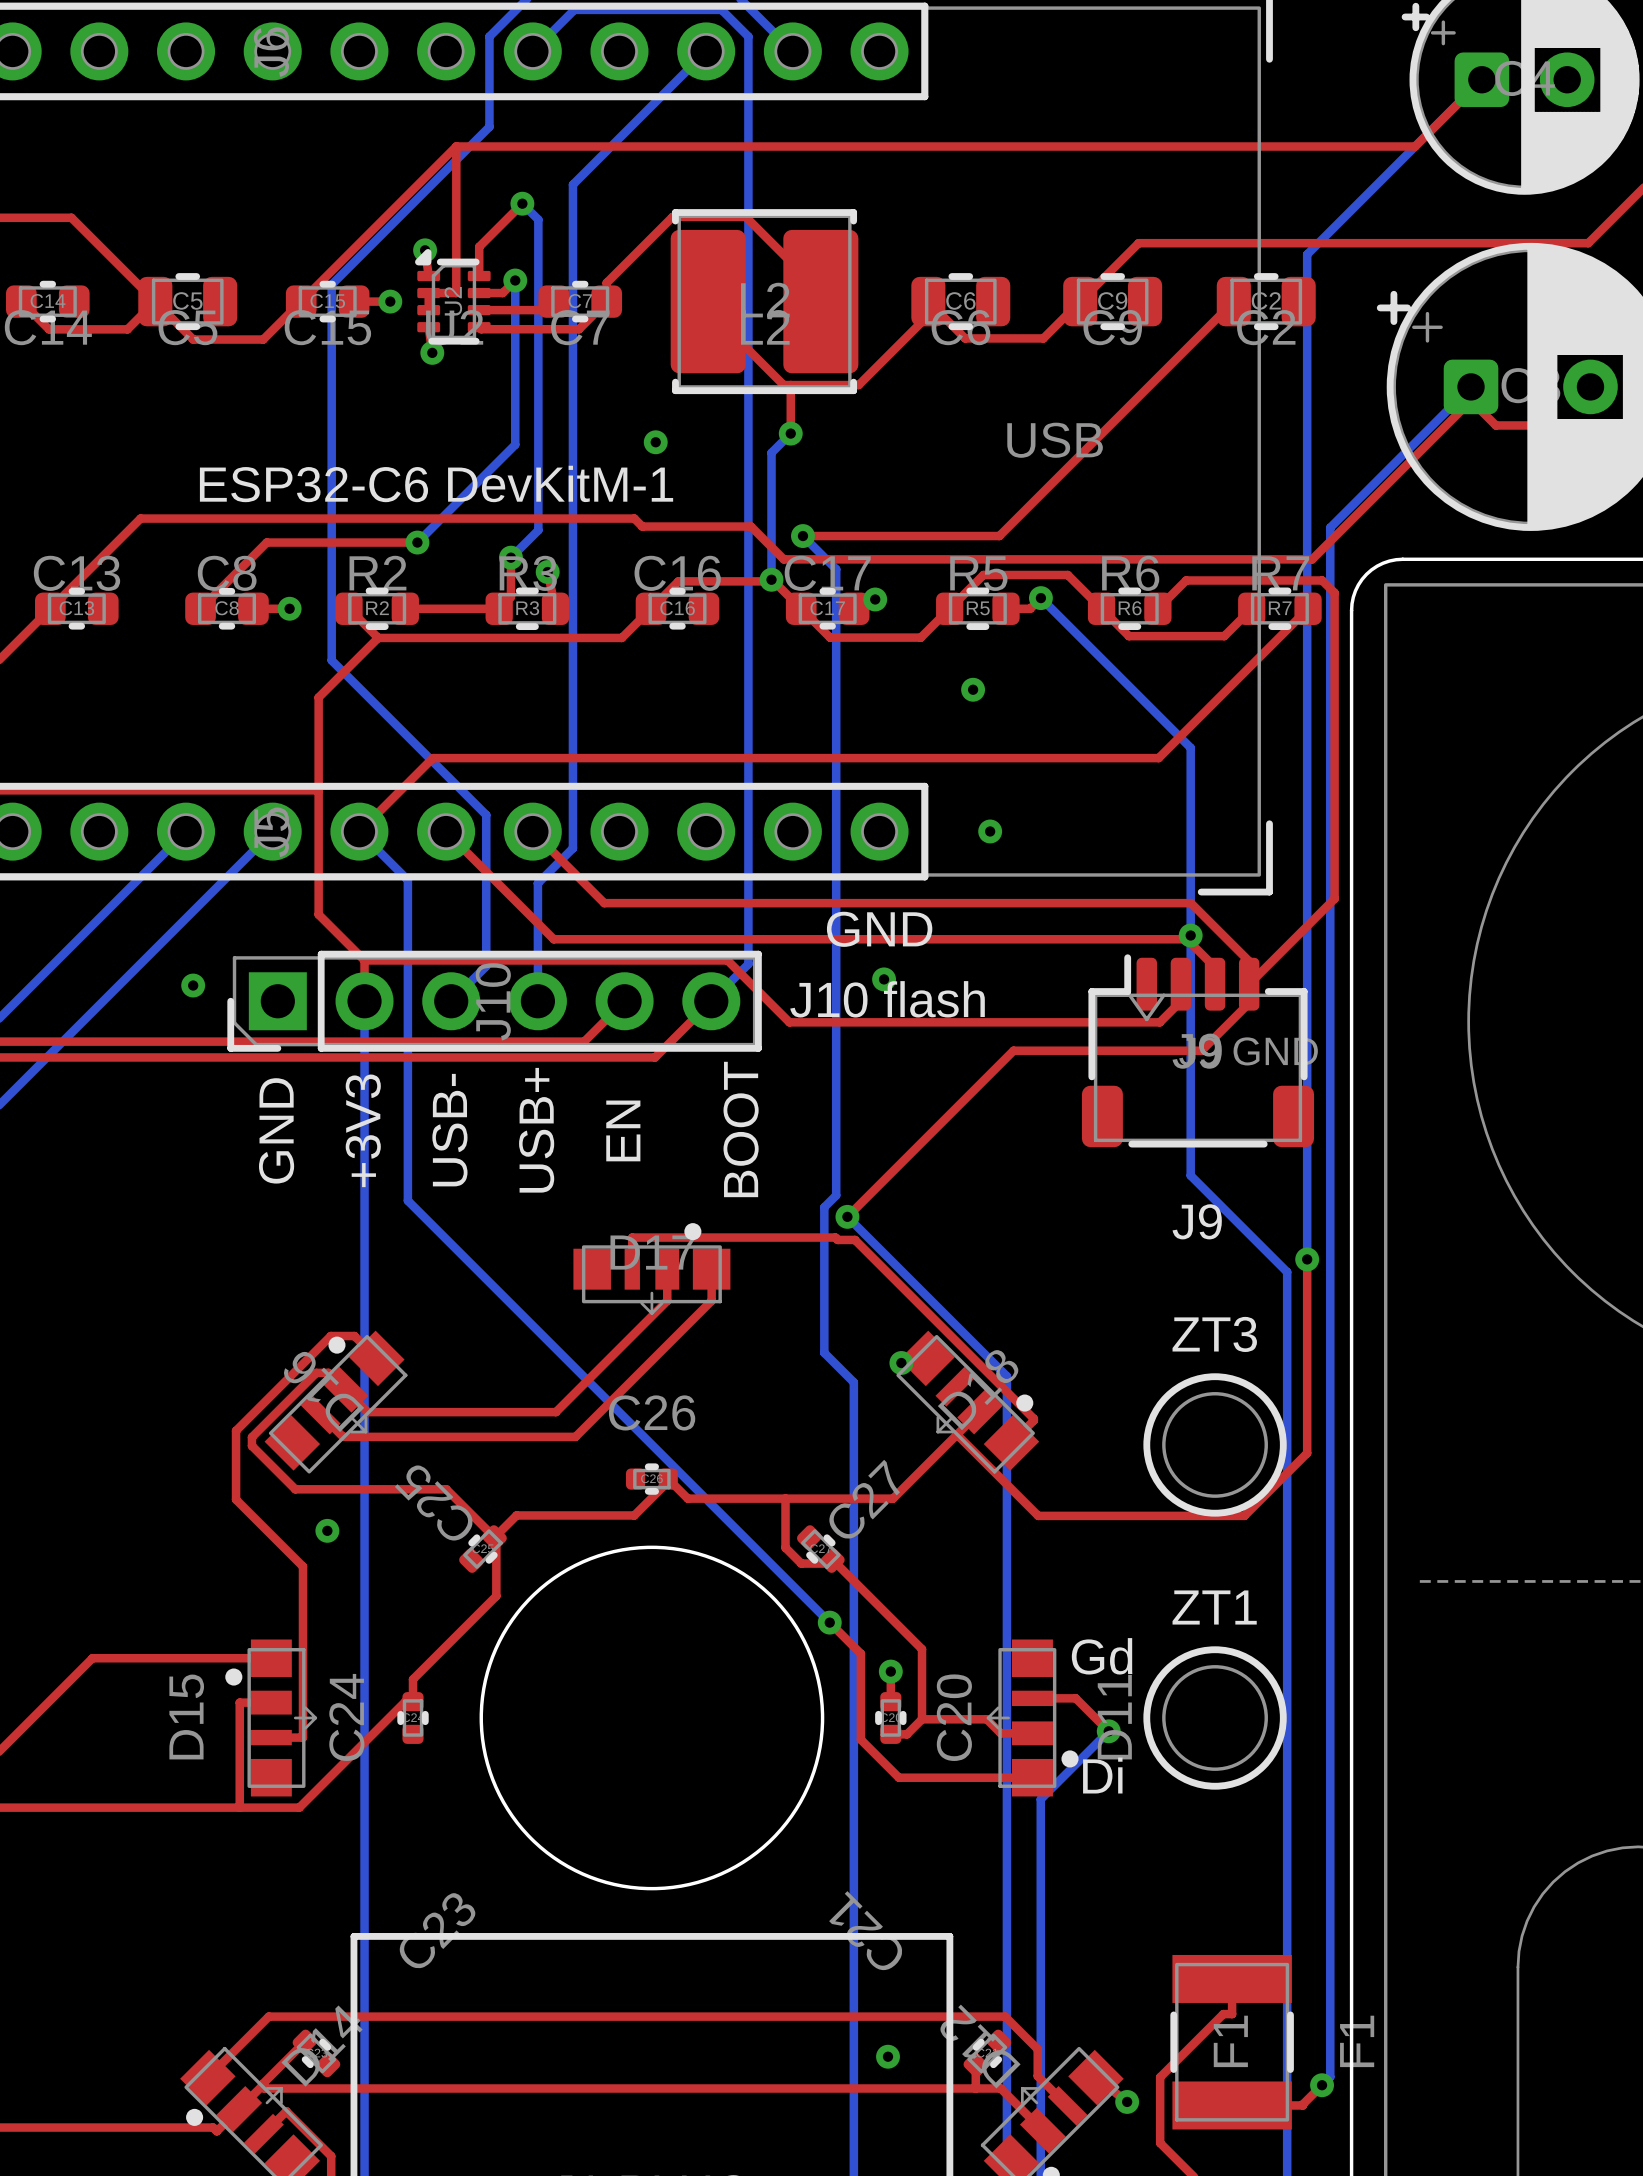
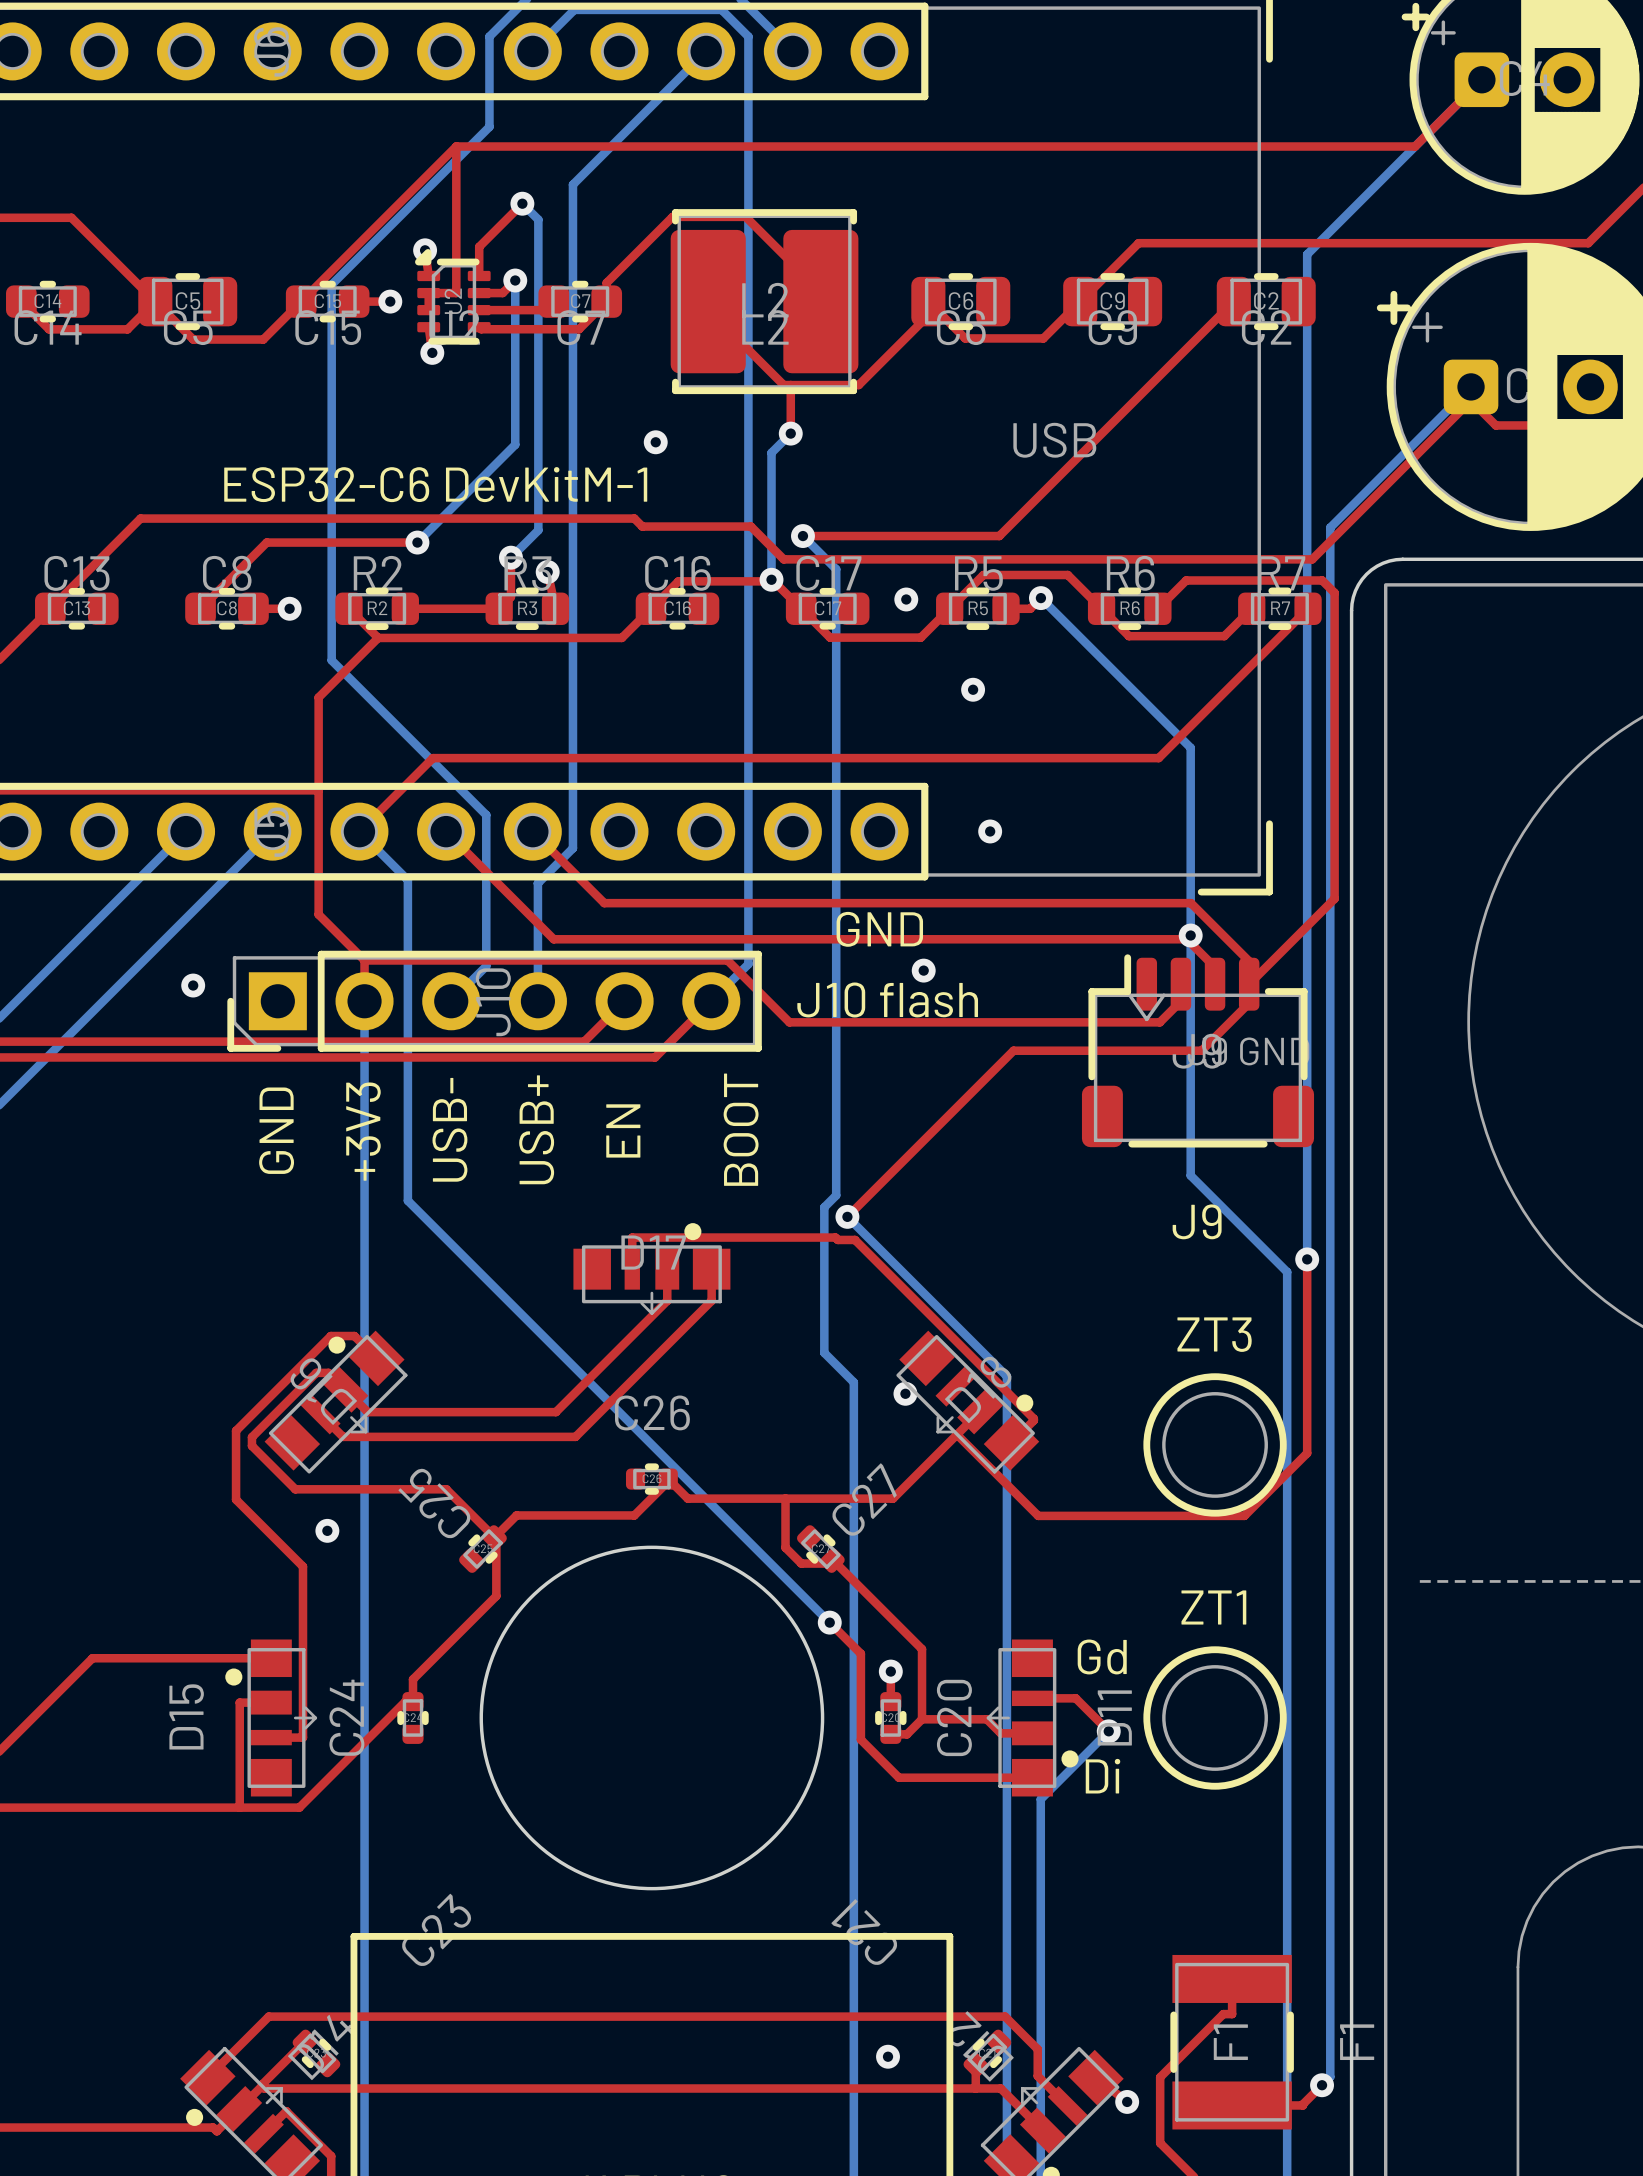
via position: (875, 599) -> (906, 599)
via position: (884, 979) -> (923, 970)
via position: (901, 1362) -> (905, 1393)

